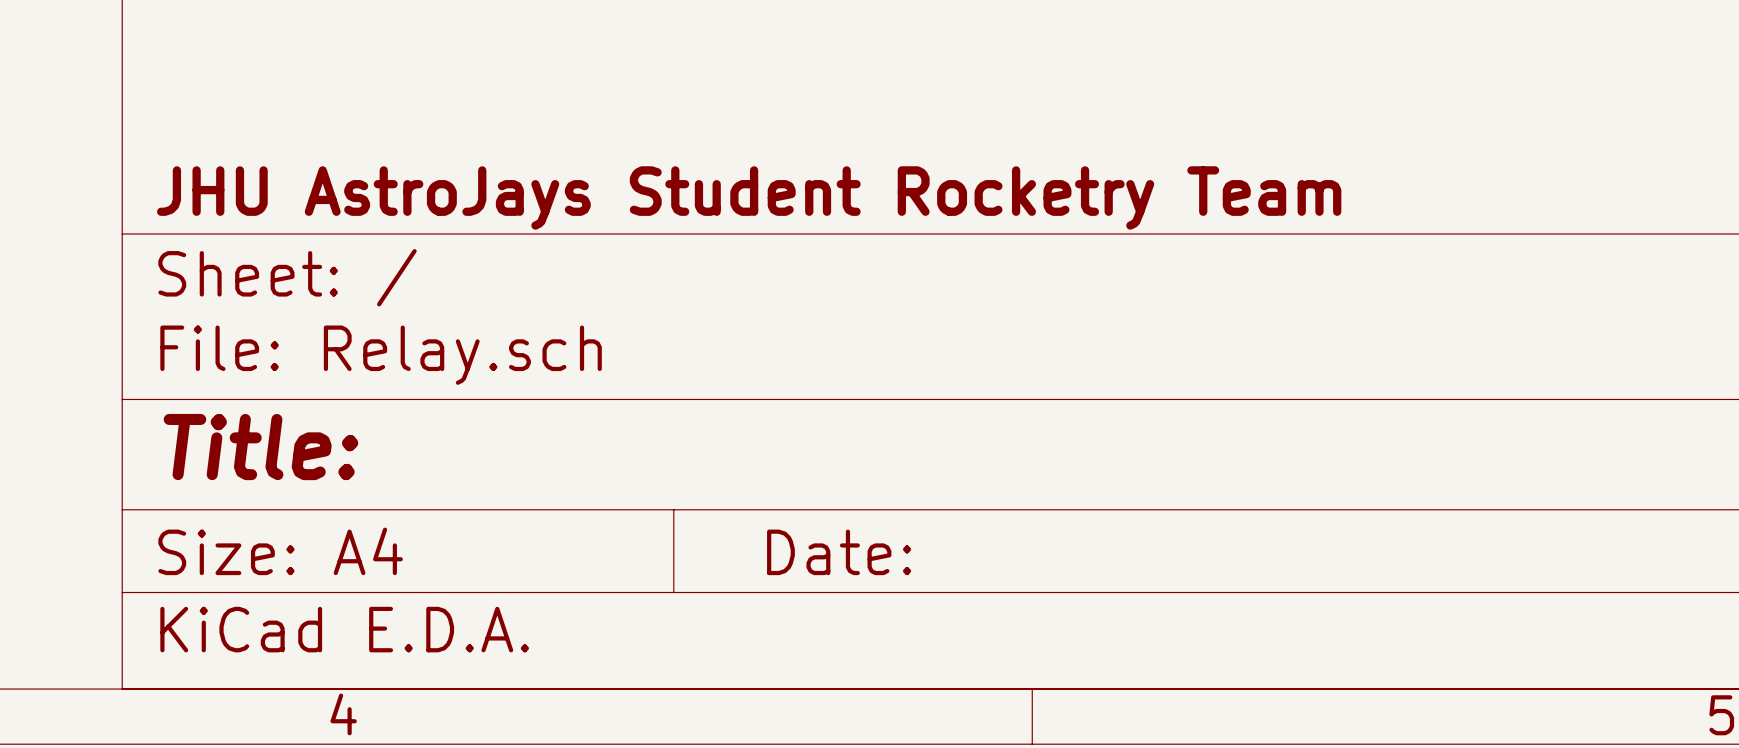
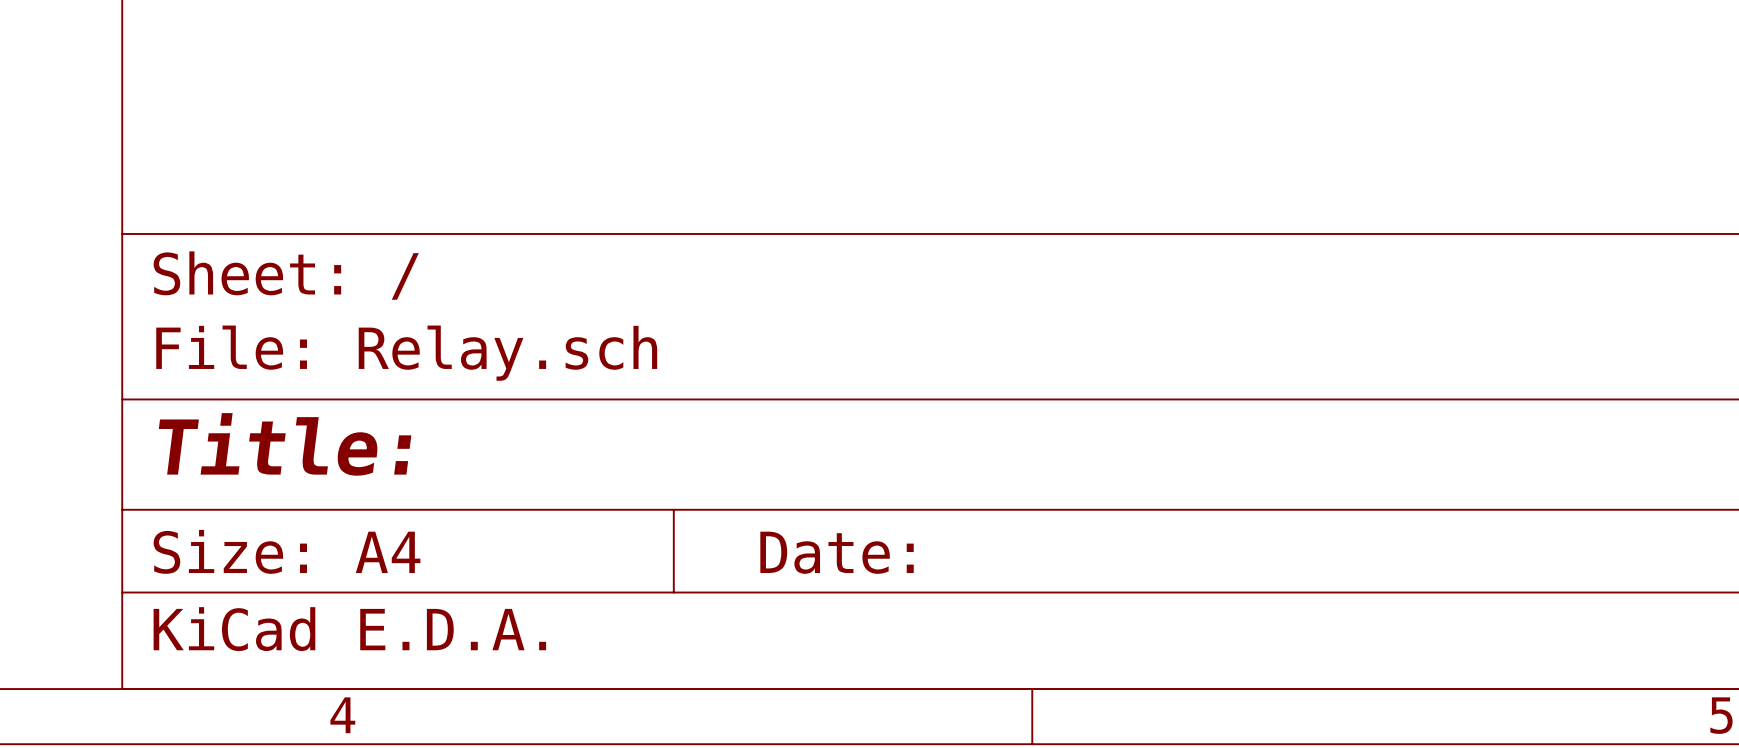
title block: JHU AstroJays Student Rocketry Team (749, 197) -> none

